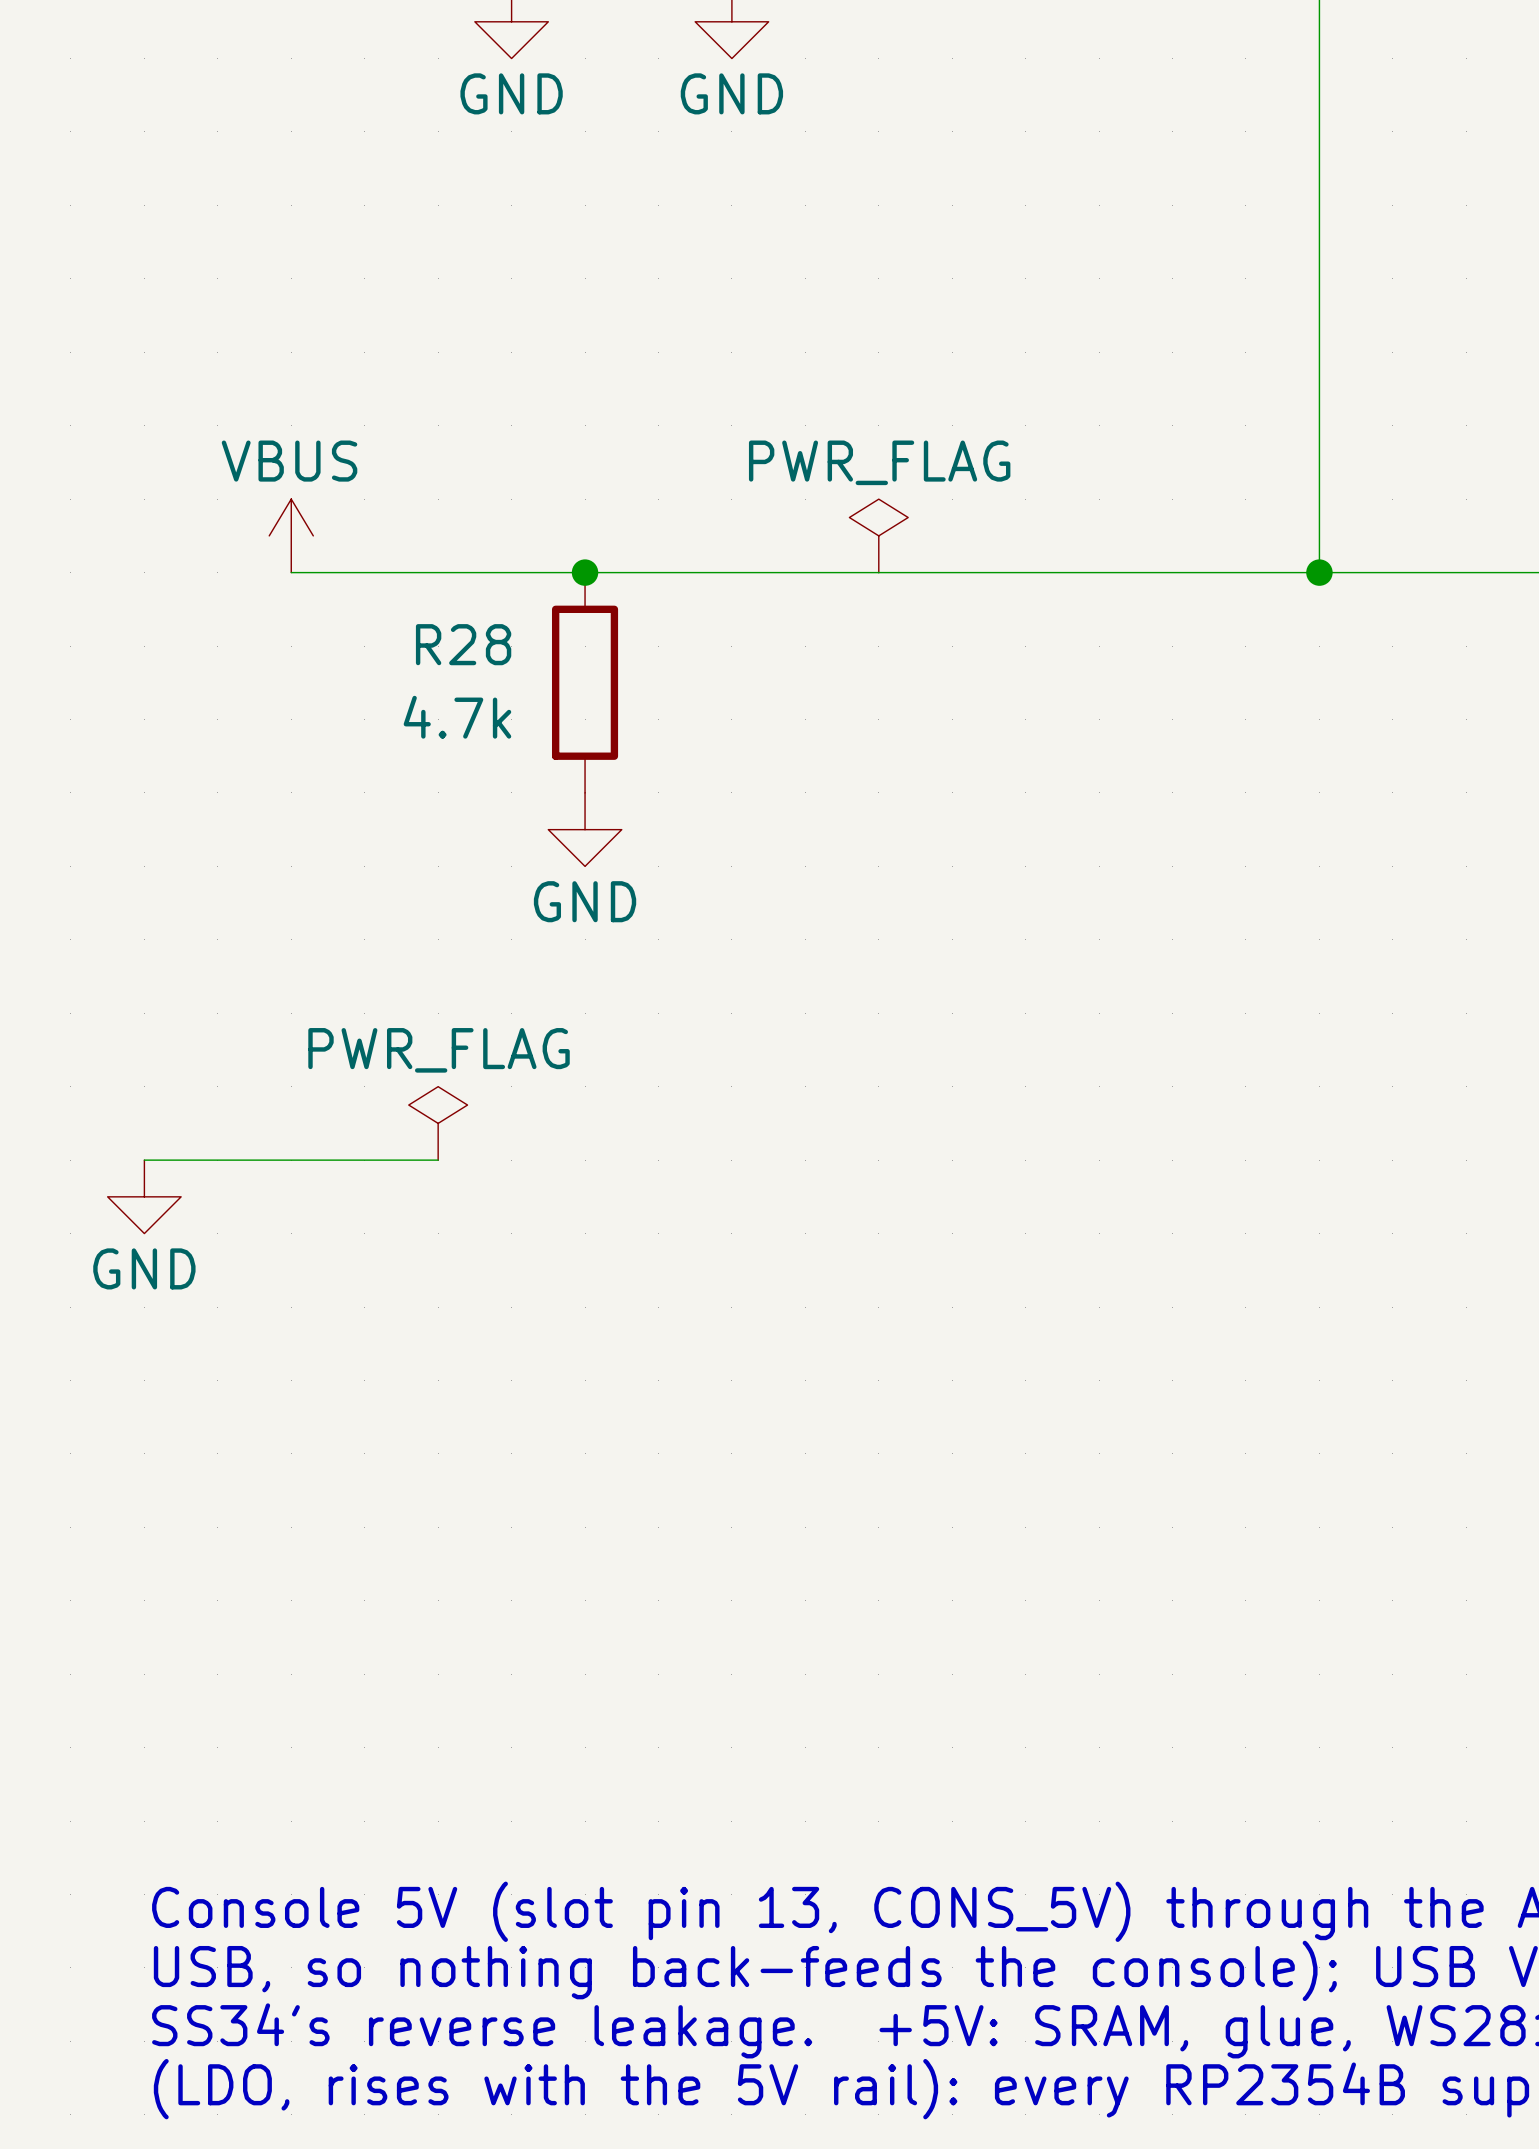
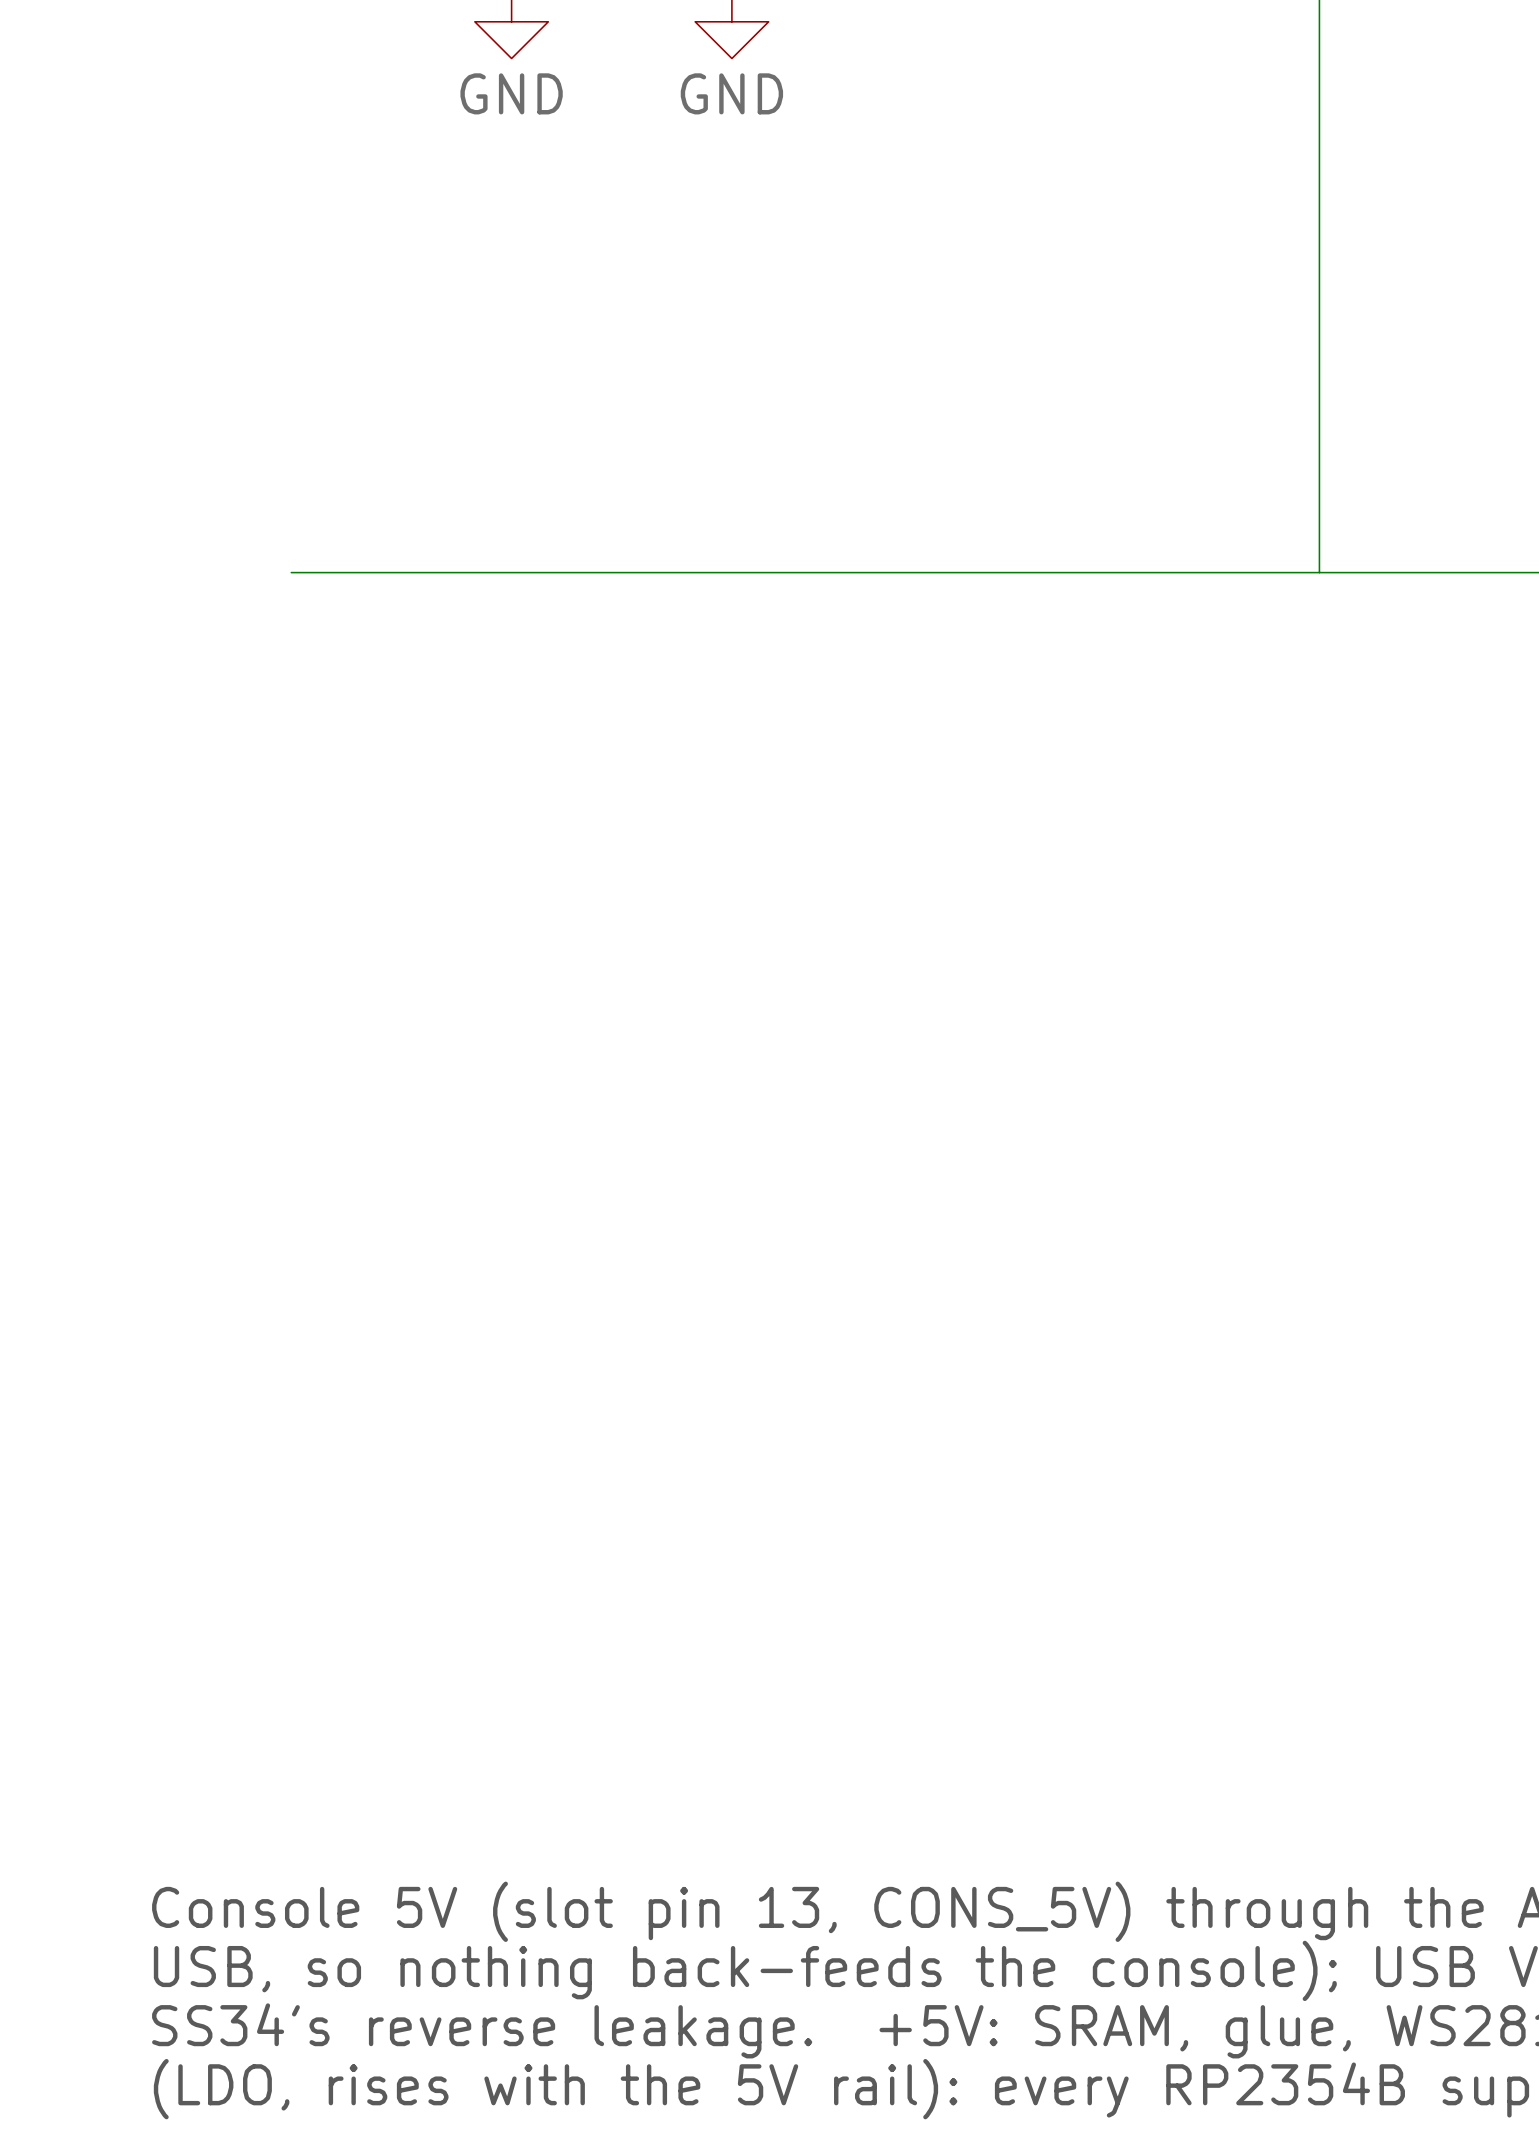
power symbol: VBUS (291, 535) -> none
power symbol: PWR_FLAG (878, 535) -> none
junction: (585, 572) -> none
junction: (1319, 572) -> none
R28: 4.7k (585, 682) -> none
power symbol: GND (585, 829) -> none
power symbol: PWR_FLAG (438, 1123) -> none
wire: (144, 1160) (438, 1160) -> none
power symbol: GND (144, 1196) -> none

